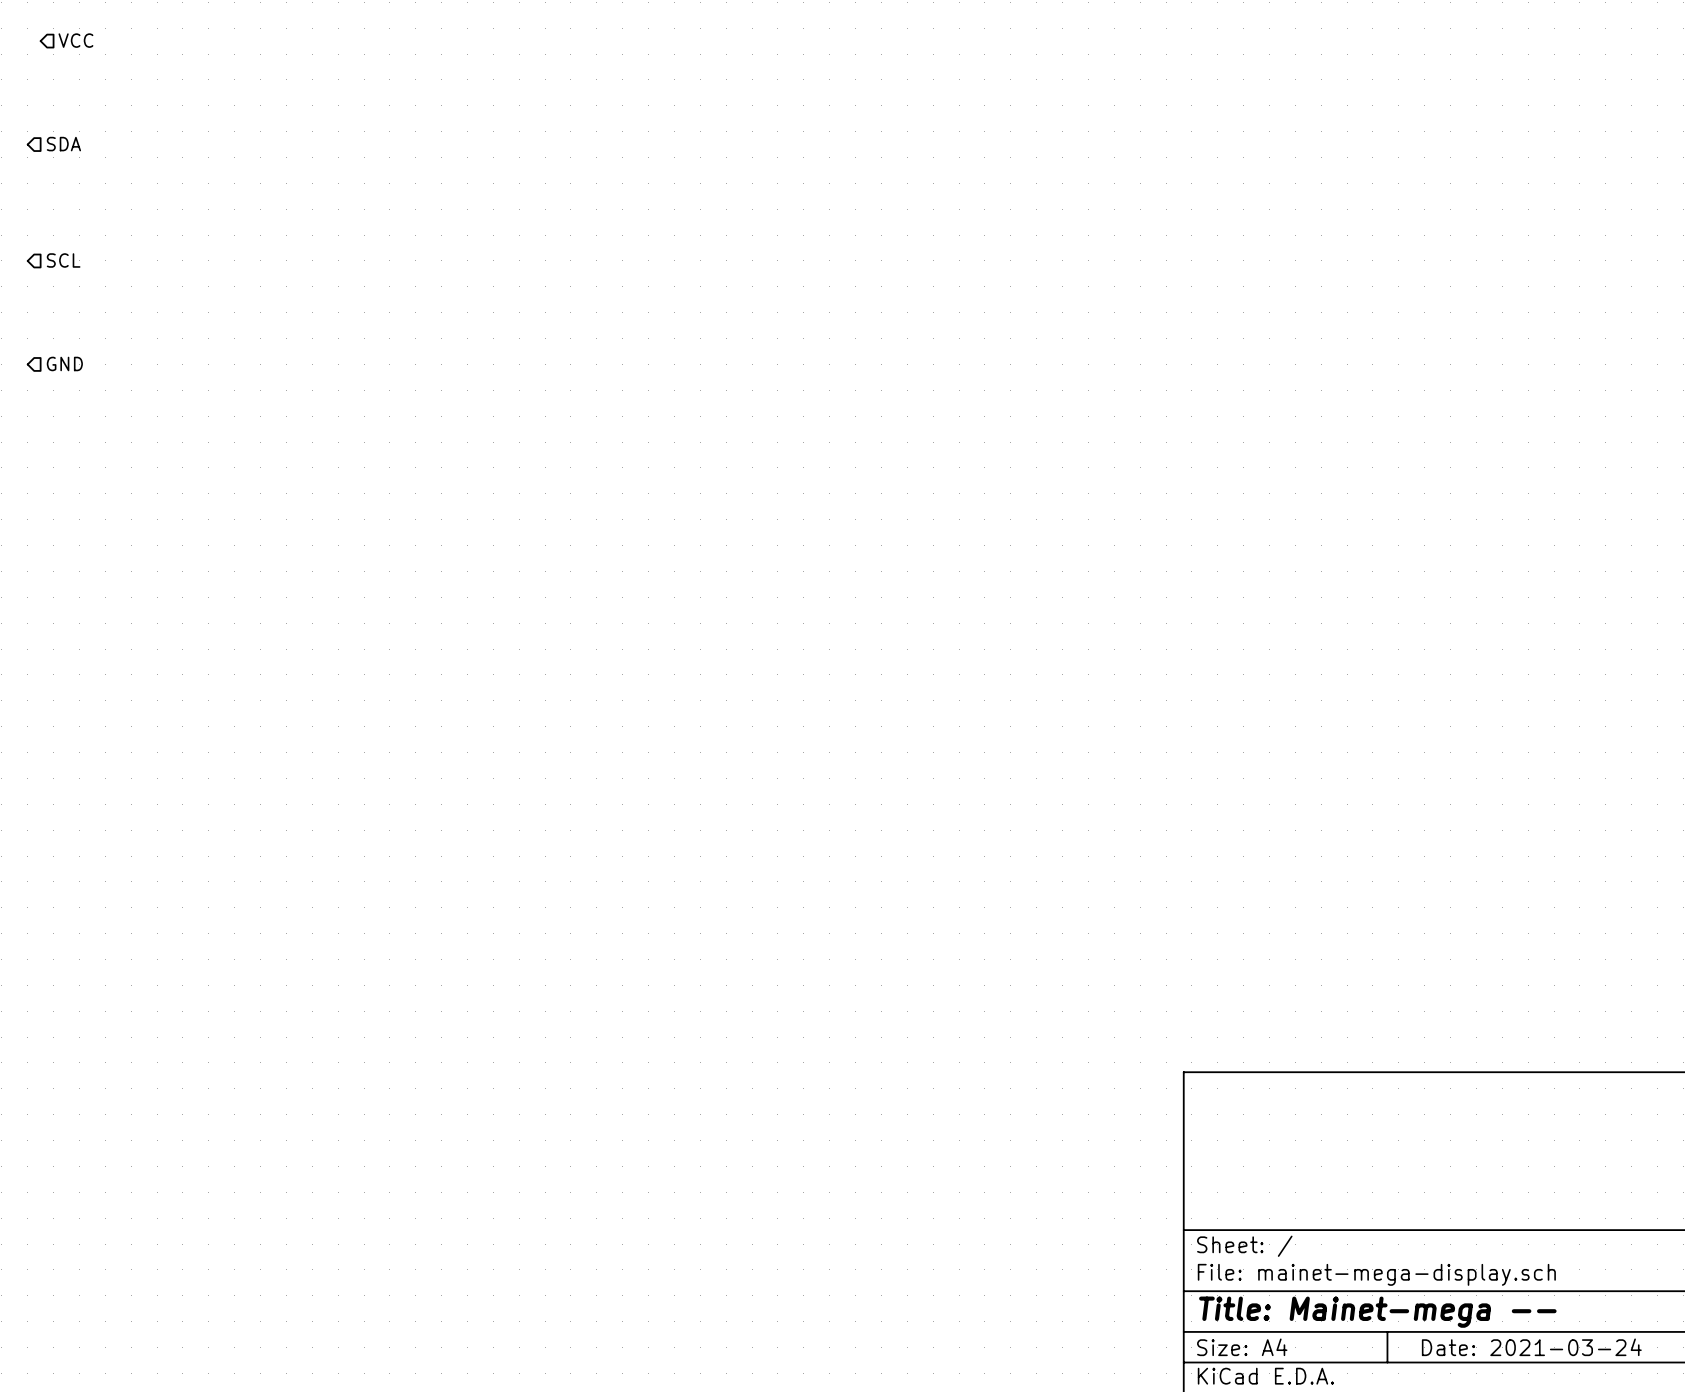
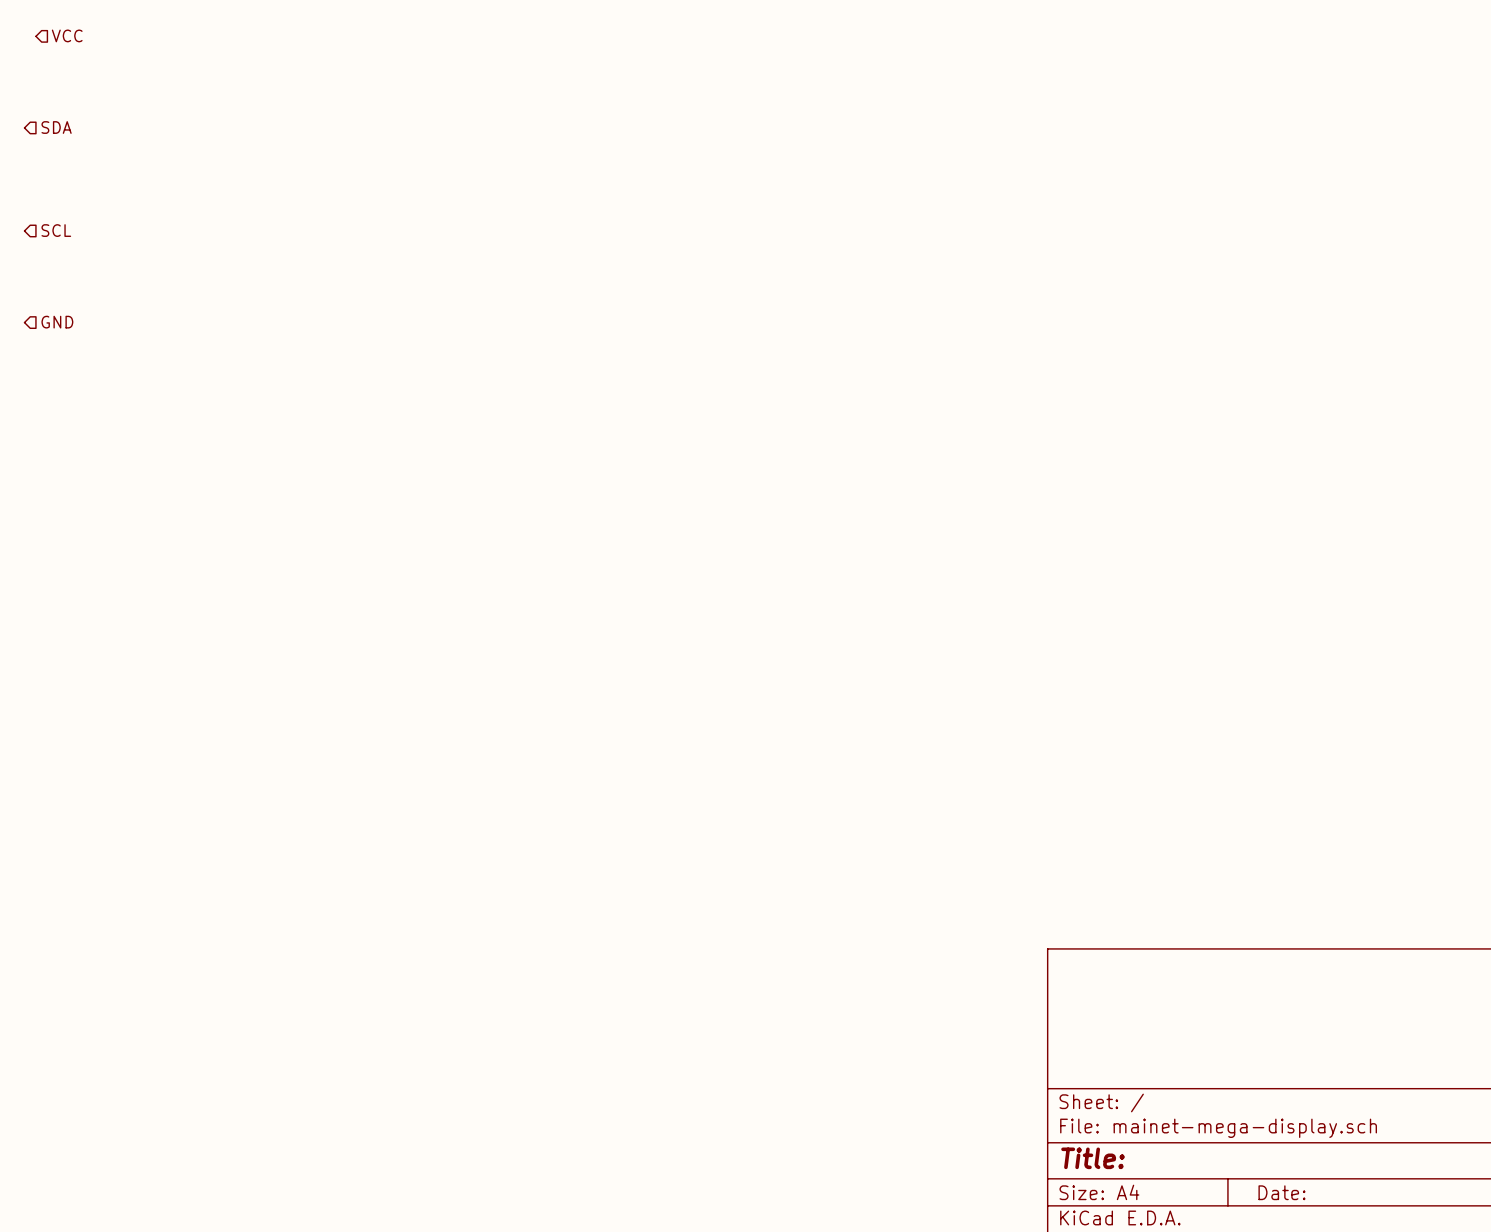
title block: Title: Mainet-mega -- (1377, 1312) -> Title: (1093, 1158)
title block: Date: 2021-03-24 (1531, 1347) -> Date: (1281, 1192)

